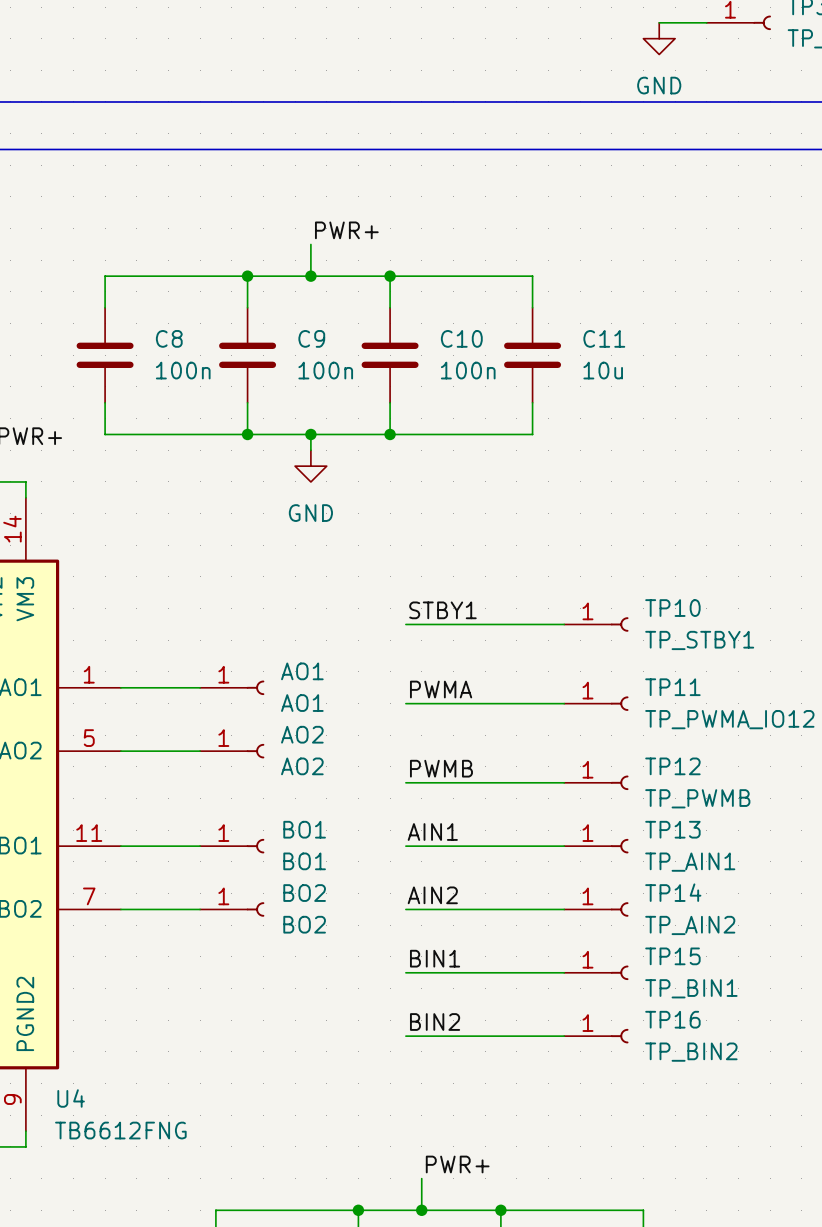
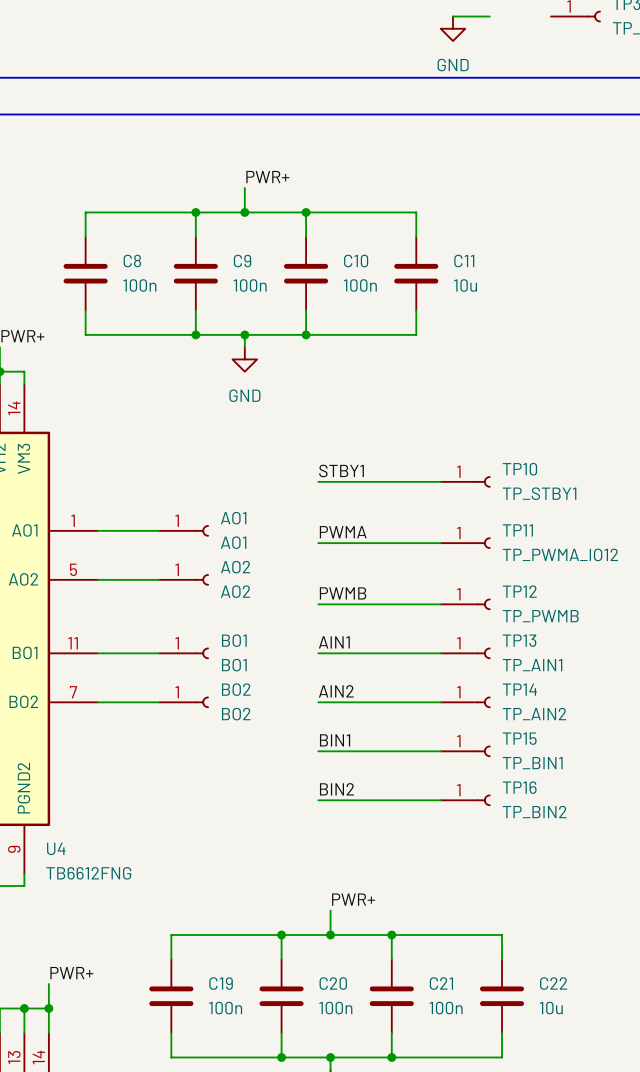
wire: (659, 22) (706, 22) -> (453, 16) (489, 16)
power symbol position: GND (659, 38) -> GND (453, 28)

